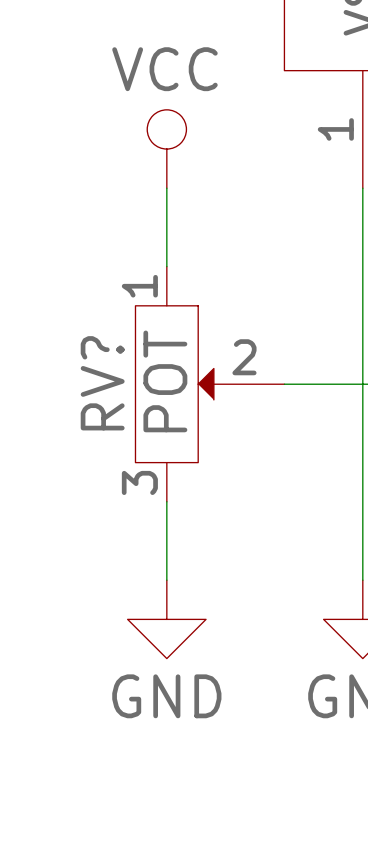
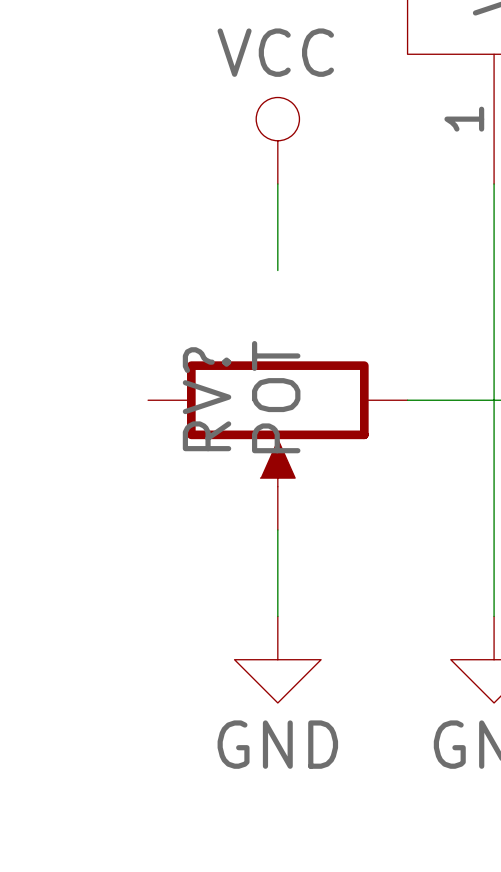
RV?: POT (209, 384) -> none
RV?: none -> POT (277, 445)

